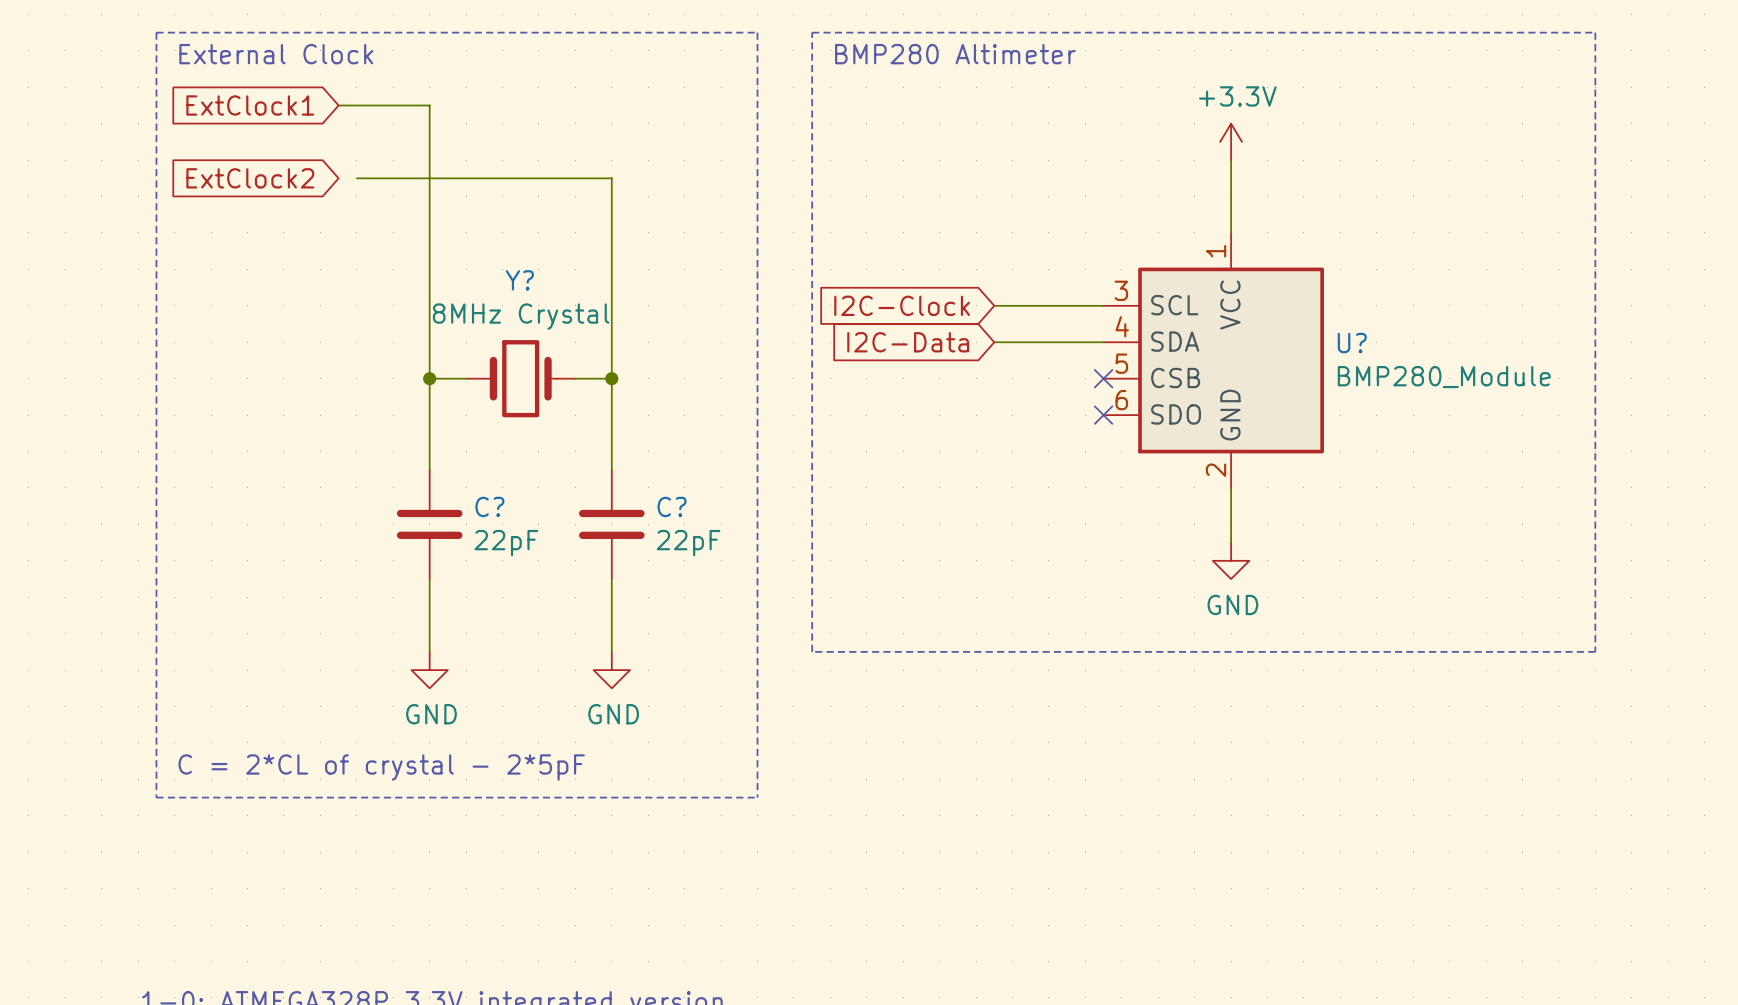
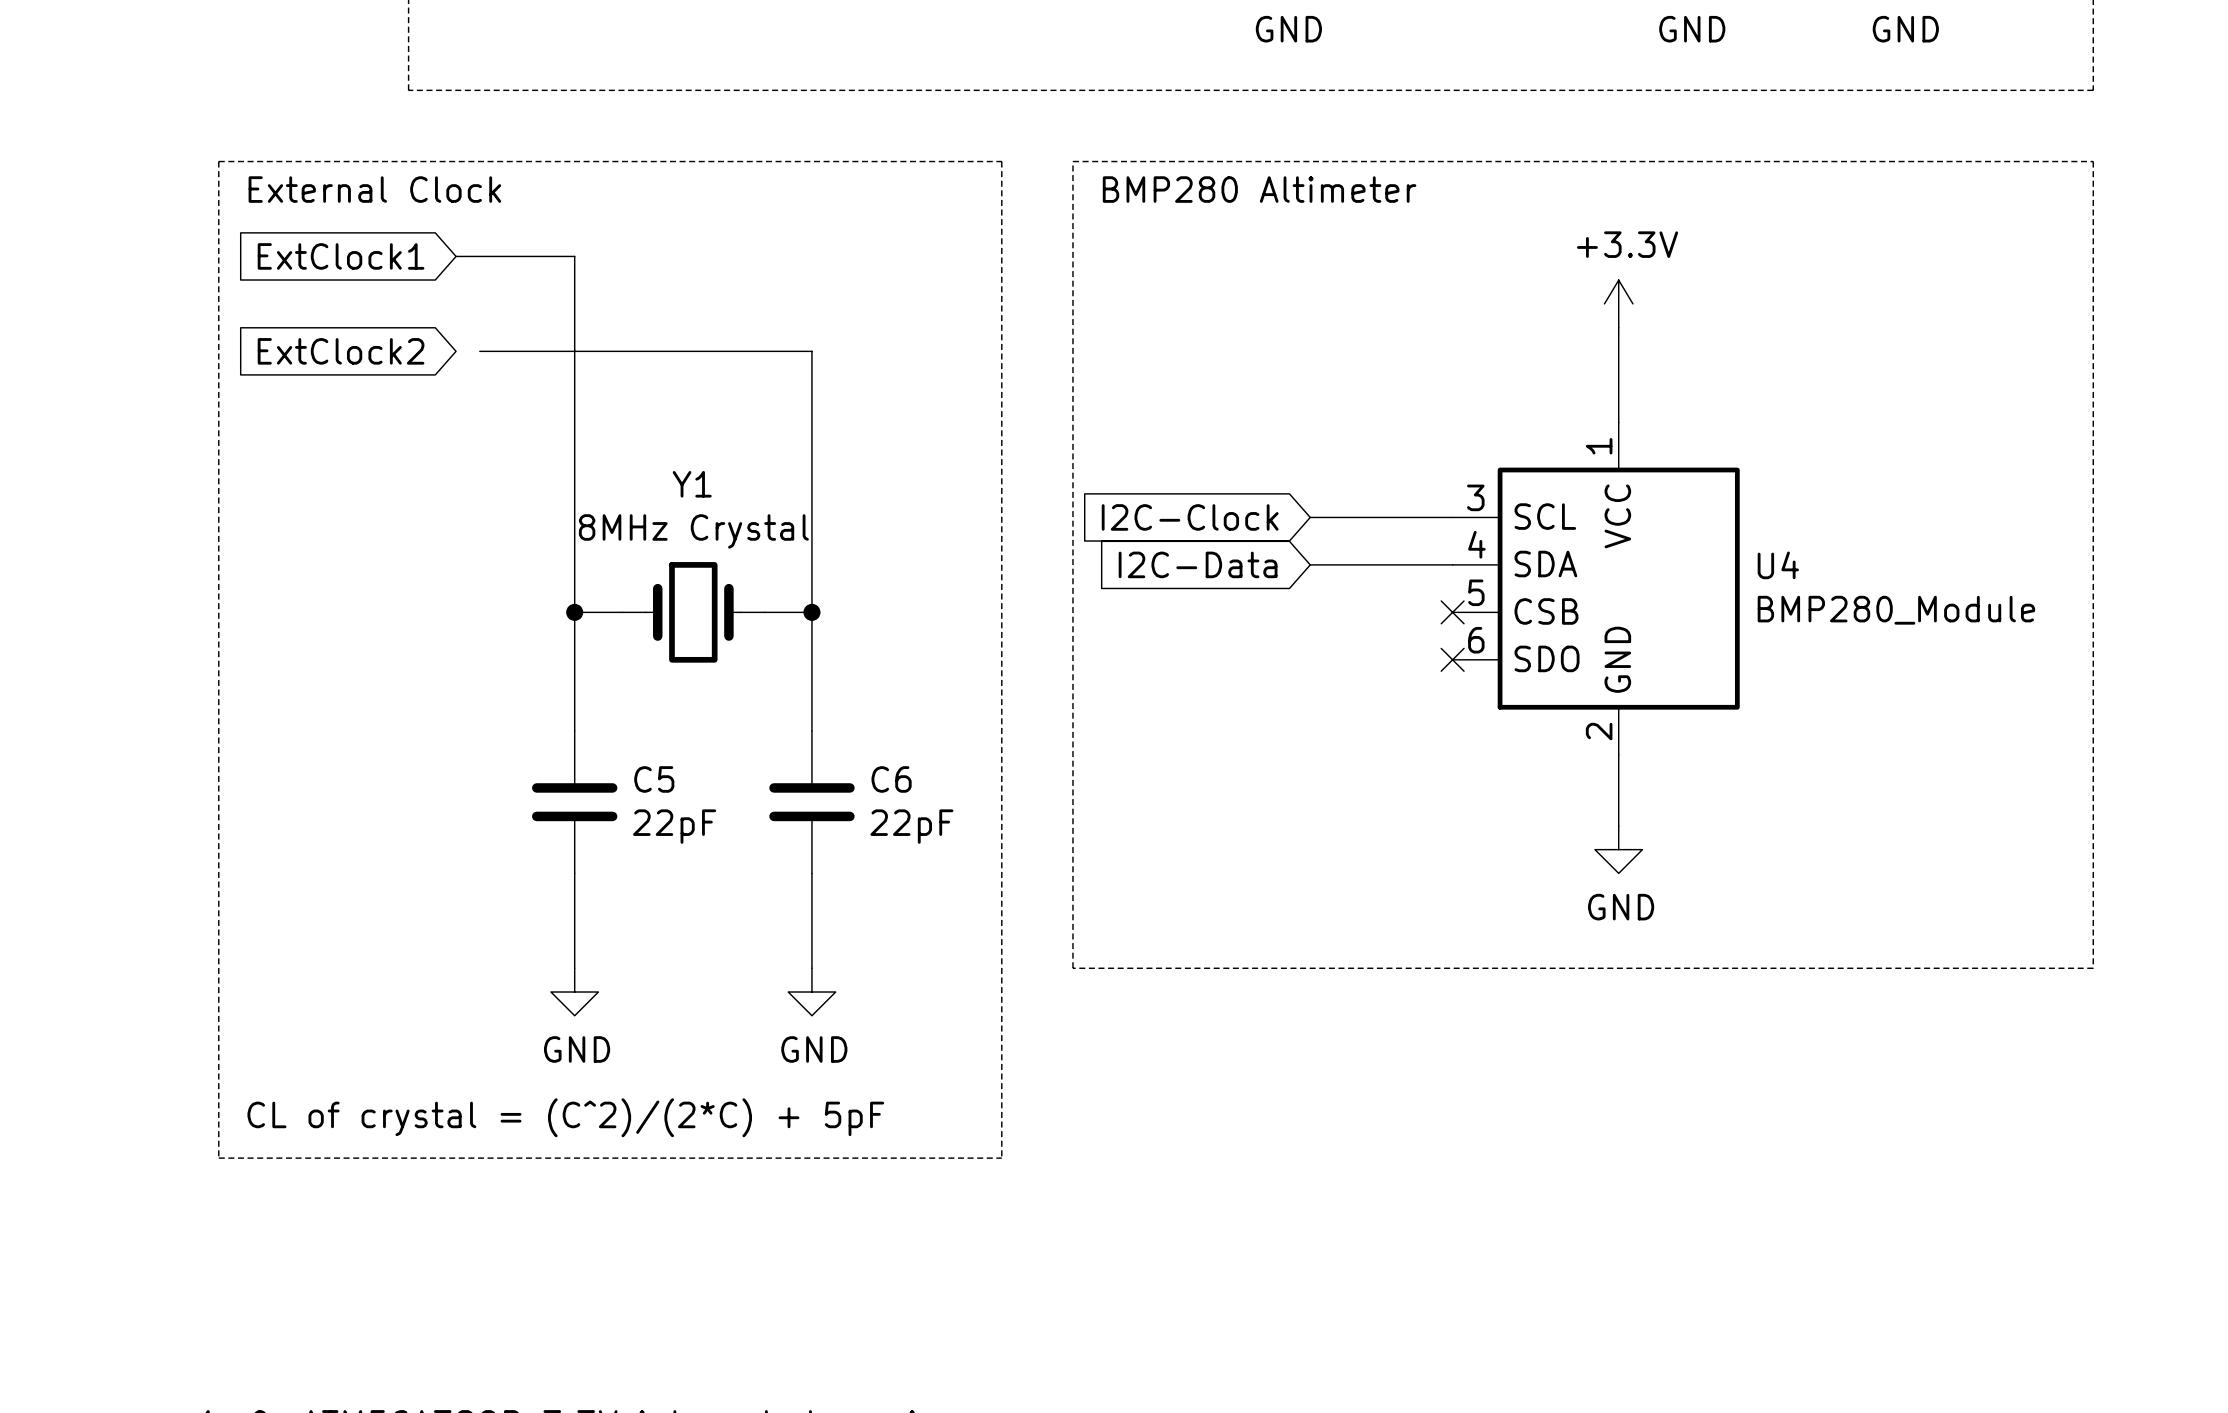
Y? name: Y? (519, 280) -> Y1 (692, 484)
U? name: U? (1352, 343) -> U4 (1778, 565)
C? name: C? (489, 506) -> C5 (654, 779)
C? name: C? (672, 506) -> C6 (891, 779)
text: C = 2*CL of crystal - 2*5pF (381, 767) -> CL of crystal = (C^2)/(2*C) + 5pF (565, 1117)

